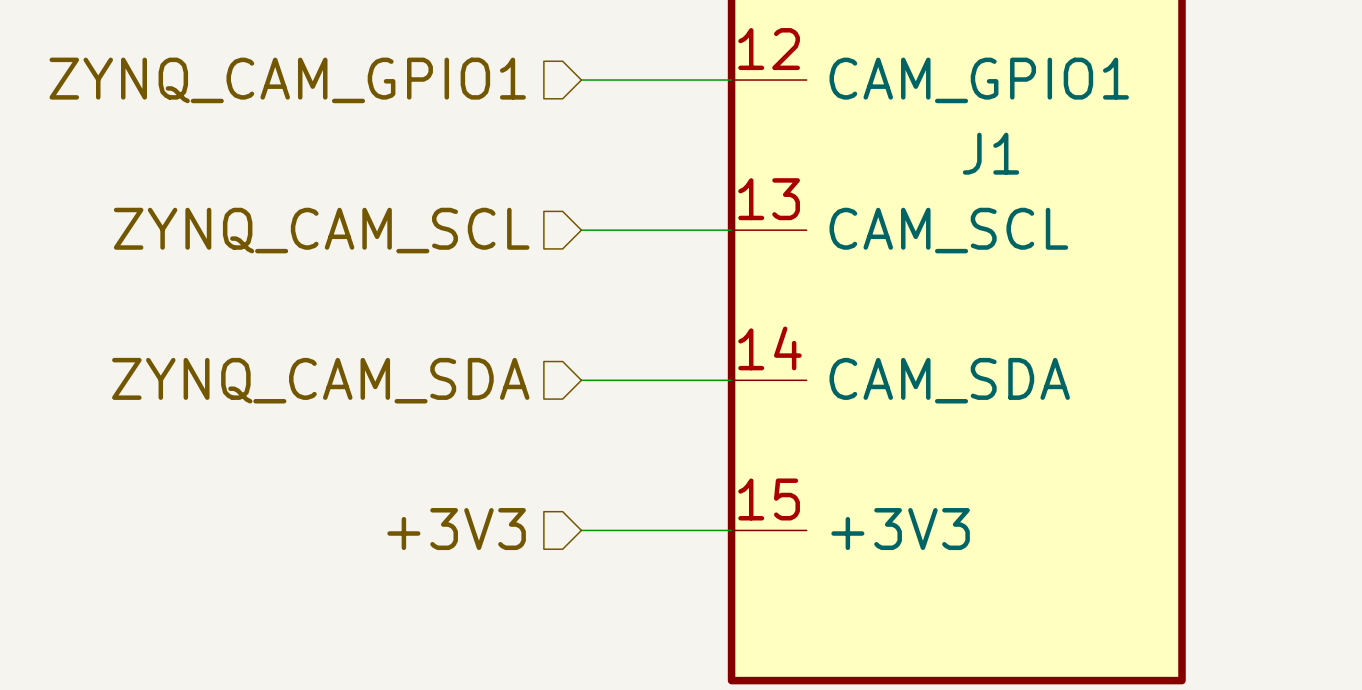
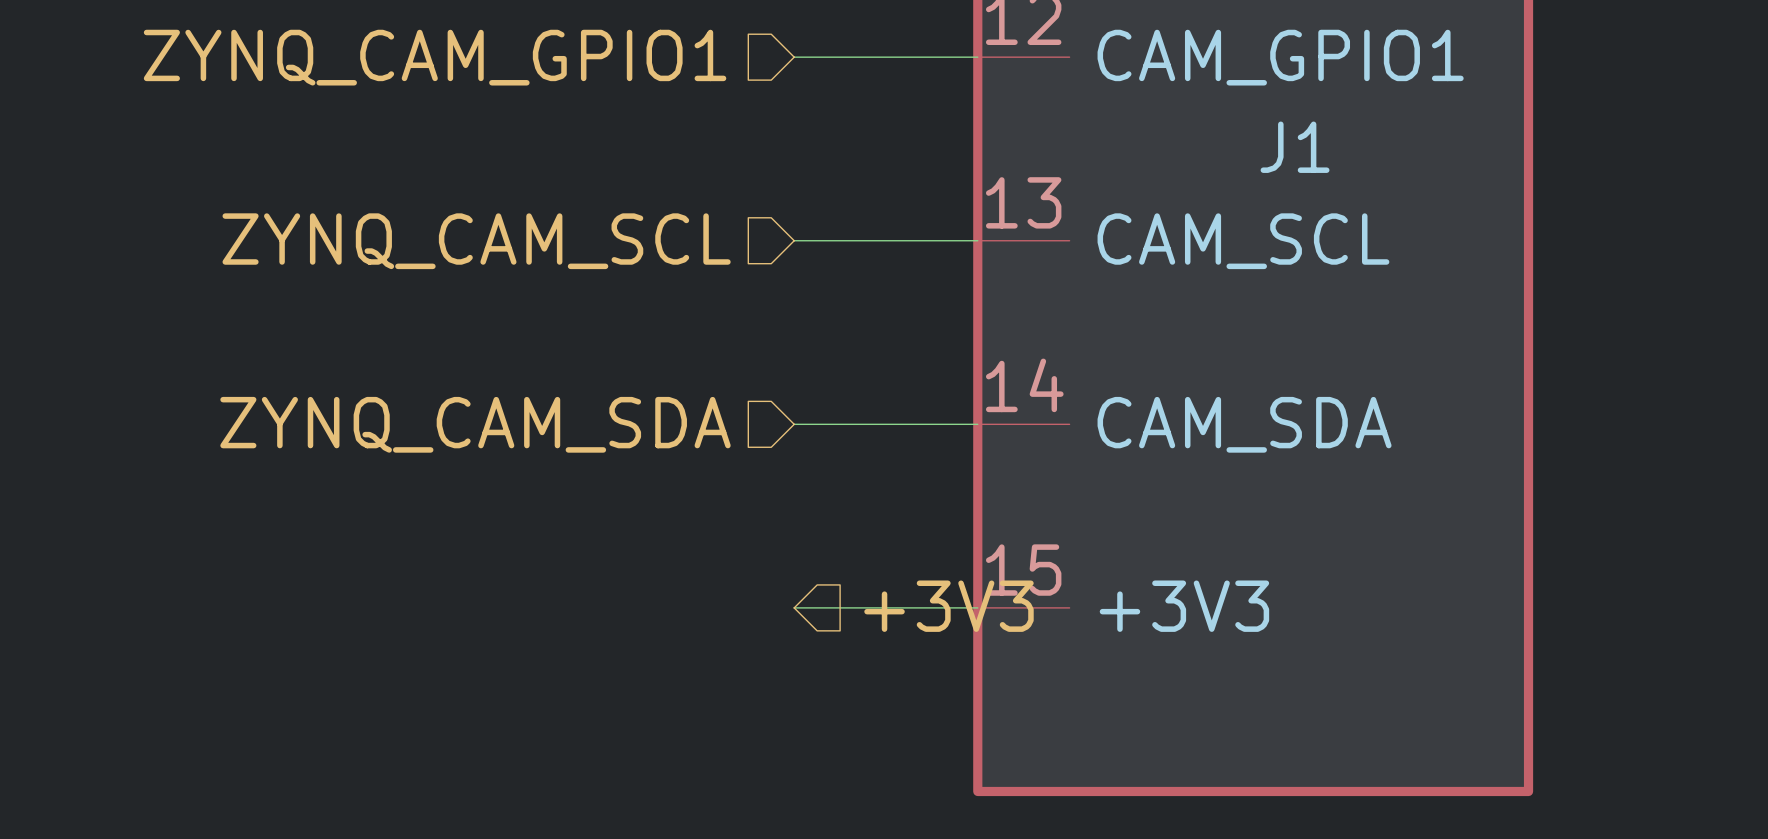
hierarchical label rotation: 0° (456, 529) -> 180° (949, 606)
hierarchical label position: +3V3 (456, 529) -> +3V3 (949, 606)

